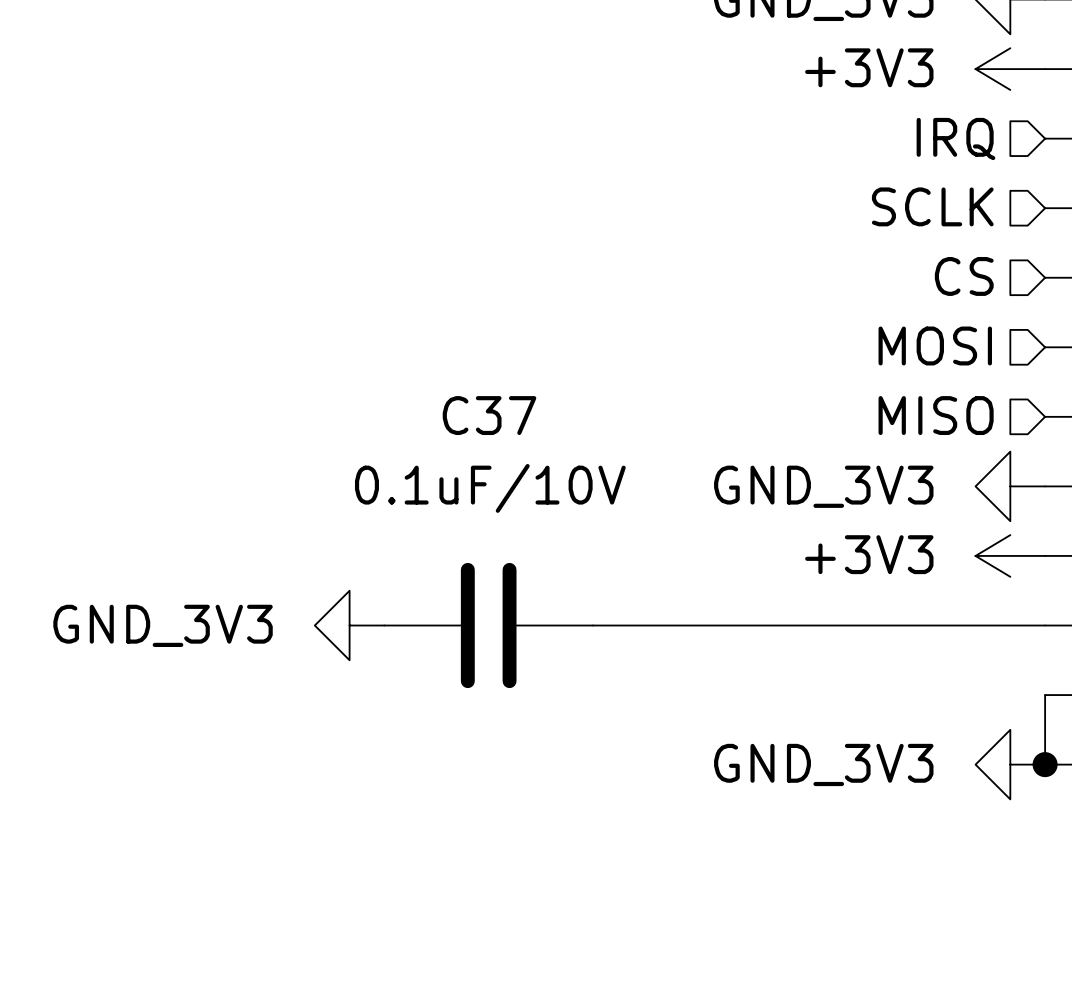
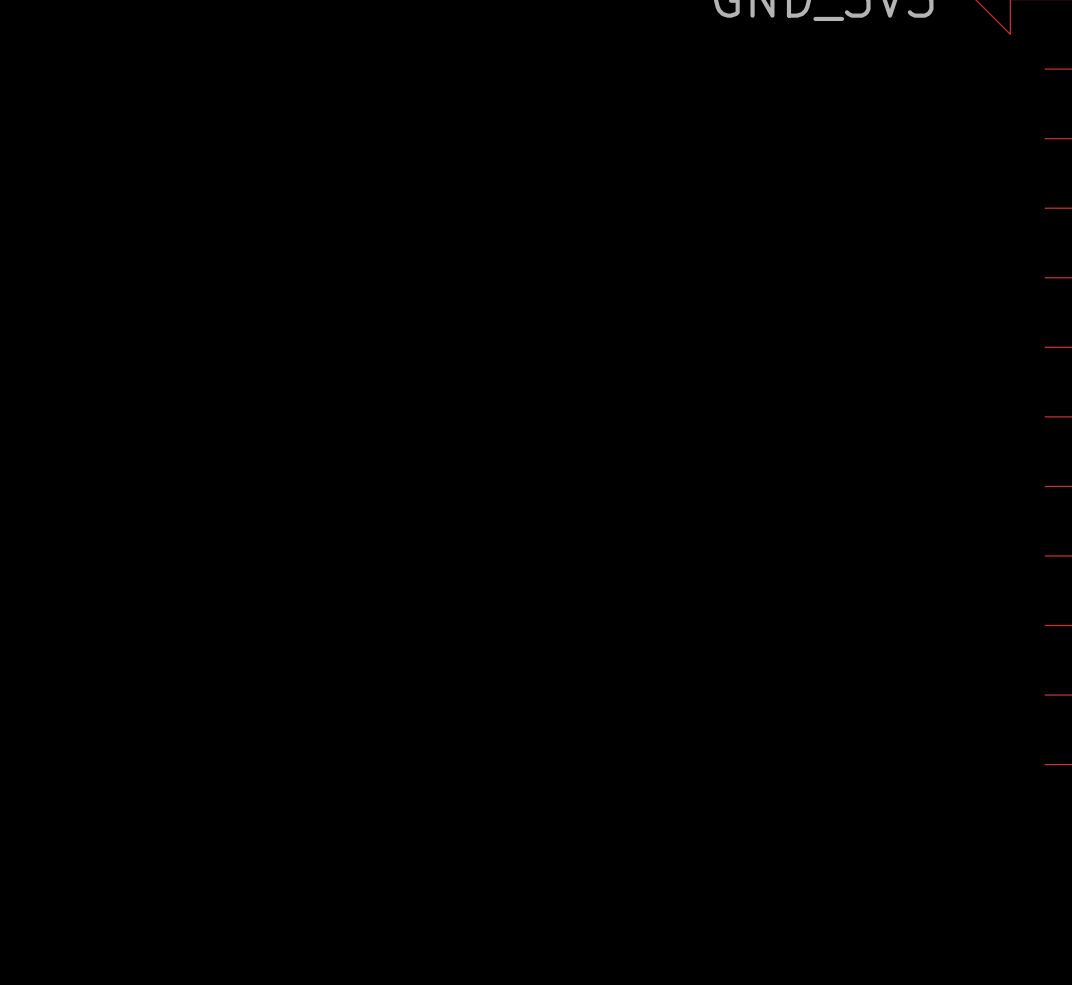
power symbol: +3V3 (1010, 69) -> none
hierarchical label: IRQ (955, 139) -> none
hierarchical label: SCLK (932, 206) -> none
hierarchical label: CS (964, 276) -> none
hierarchical label: MOSI (935, 346) -> none
hierarchical label: MISO (936, 415) -> none
power symbol: GND_3V3 (1010, 486) -> none
power symbol: +3V3 (1010, 555) -> none
power symbol: GND_3V3 (349, 625) -> none
C37: 0.1uF/10V (488, 625) -> none
wire: (593, 625) (1045, 625) -> none
wire: (1045, 695) (1045, 764) -> none
power symbol: GND_3V3 (1010, 764) -> none
junction: (1045, 764) -> none

